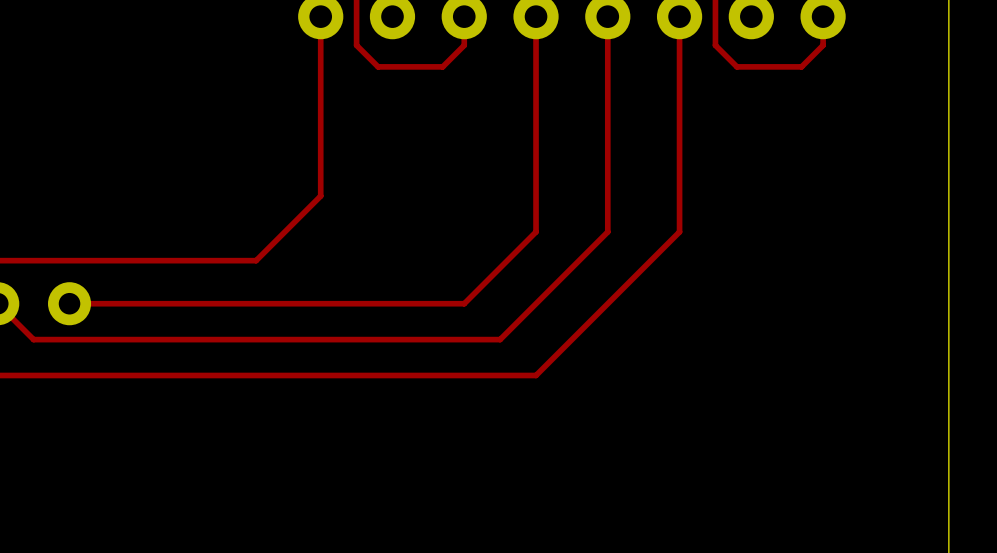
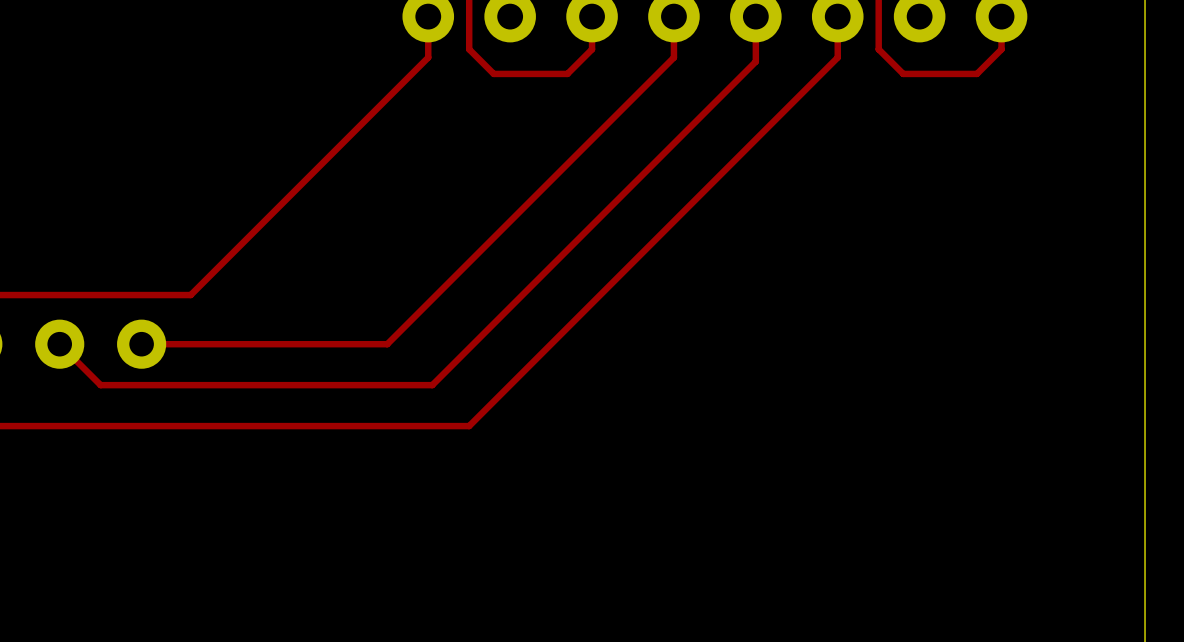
top track: (320, 52) (320, 196) (256, 260) (112, 260) -> (428, 57) (190, 295)
top track: (536, 52) (536, 231) (464, 303) (284, 303) -> (673, 57) (387, 344)
top track: (679, 52) (679, 231) (536, 375) (356, 375) -> (837, 57) (469, 426)
top track: (607, 56) (607, 231) (500, 339) (324, 339) -> (755, 61) (432, 385)

